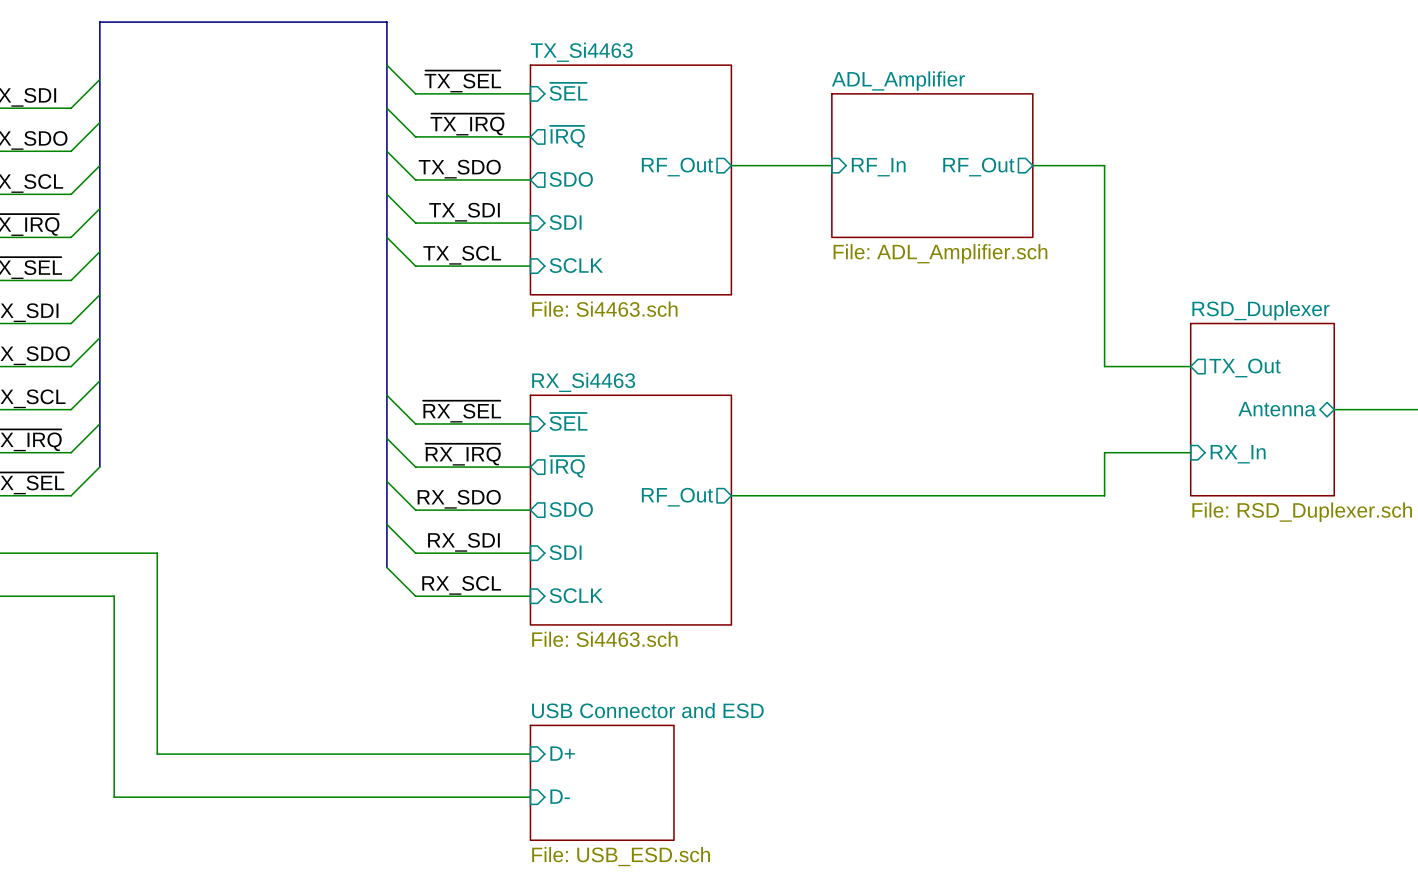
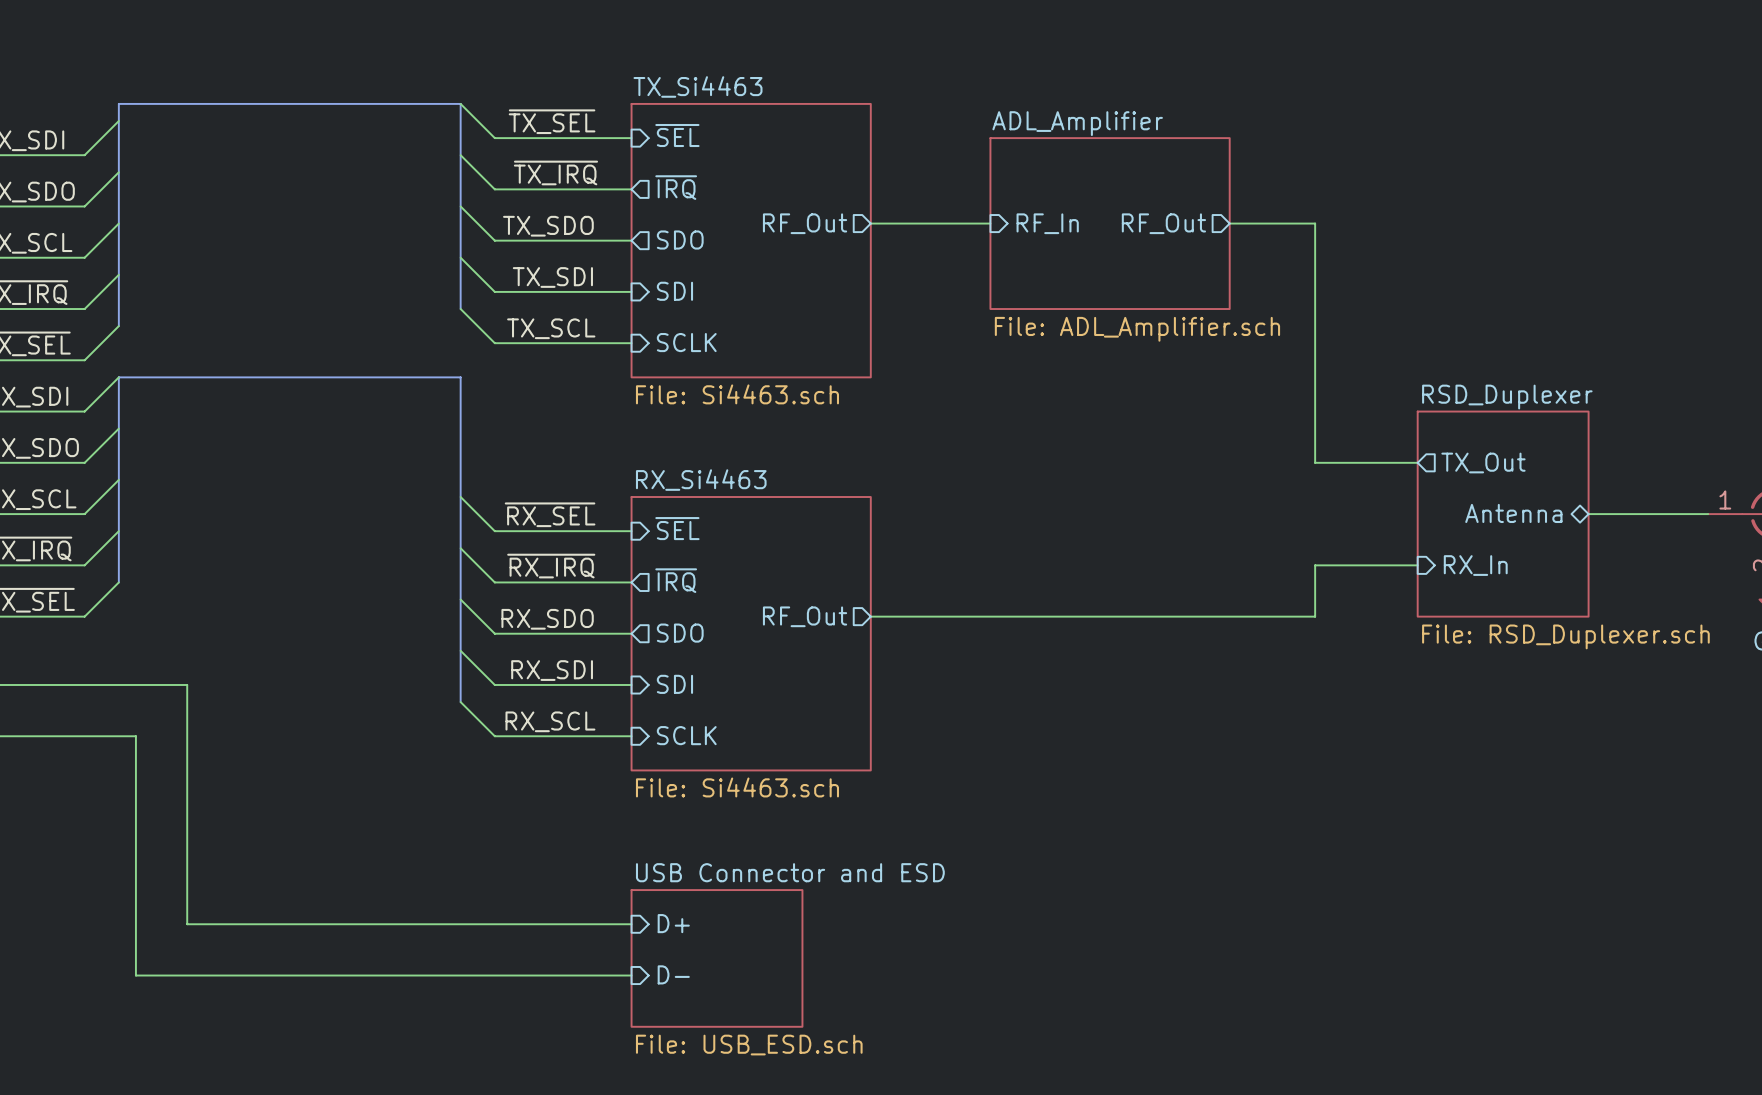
bus: (99, 65) (99, 22) (386, 22) (386, 65) -> (118, 103) (460, 103)
bus: (386, 237) (386, 294) -> none
bus: (99, 251) (99, 294) -> (460, 377) (118, 377)

